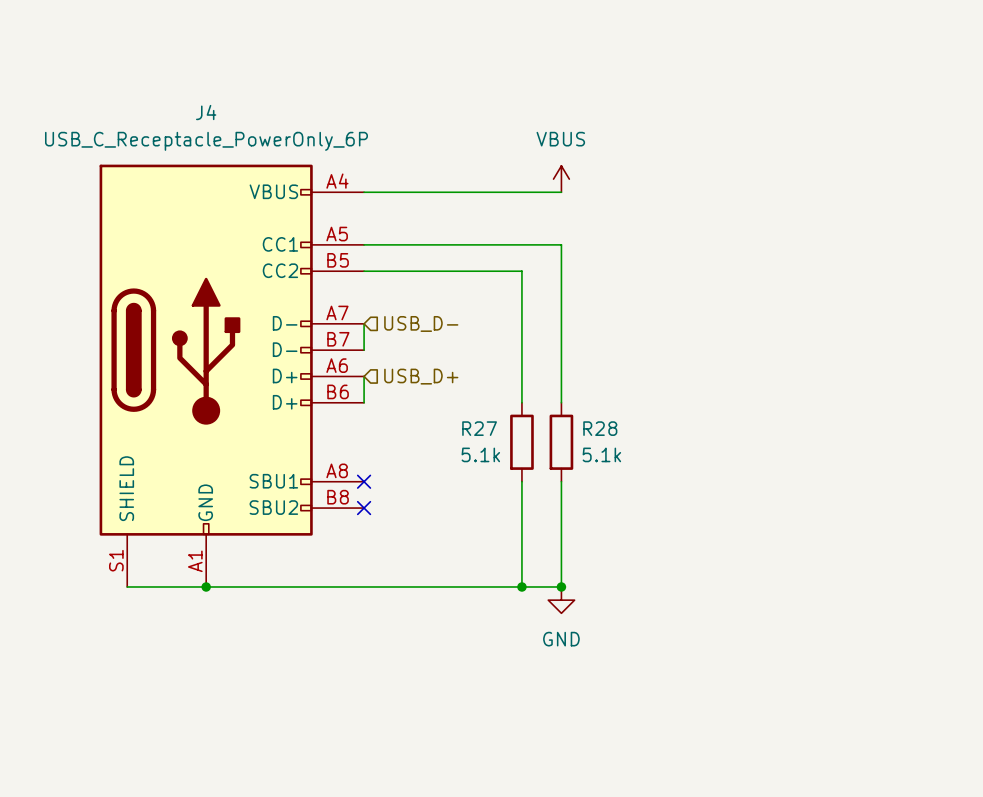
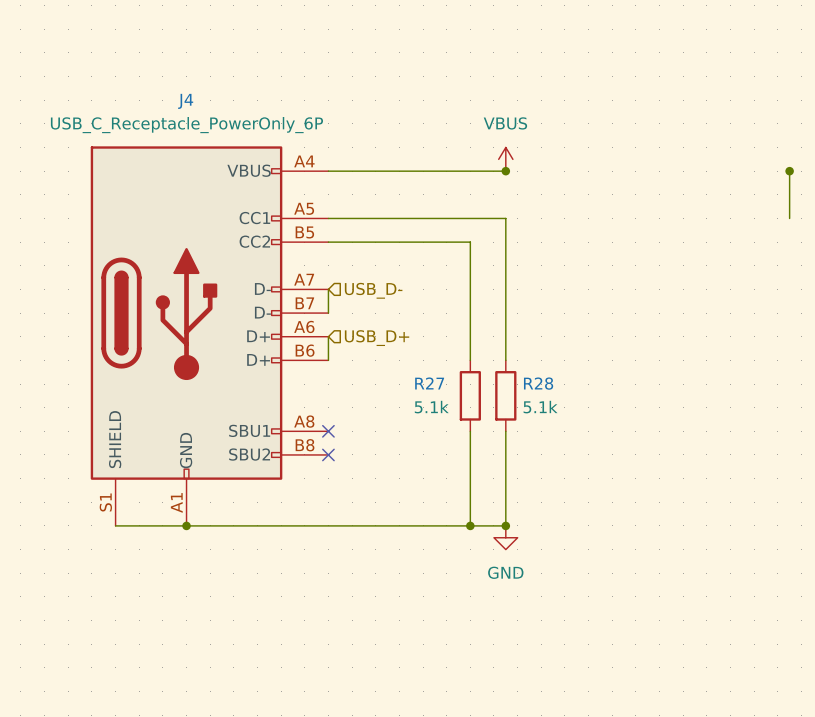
junction: none -> (505, 171)
wire: none -> (789, 171) (789, 218)
junction: none -> (789, 171)

